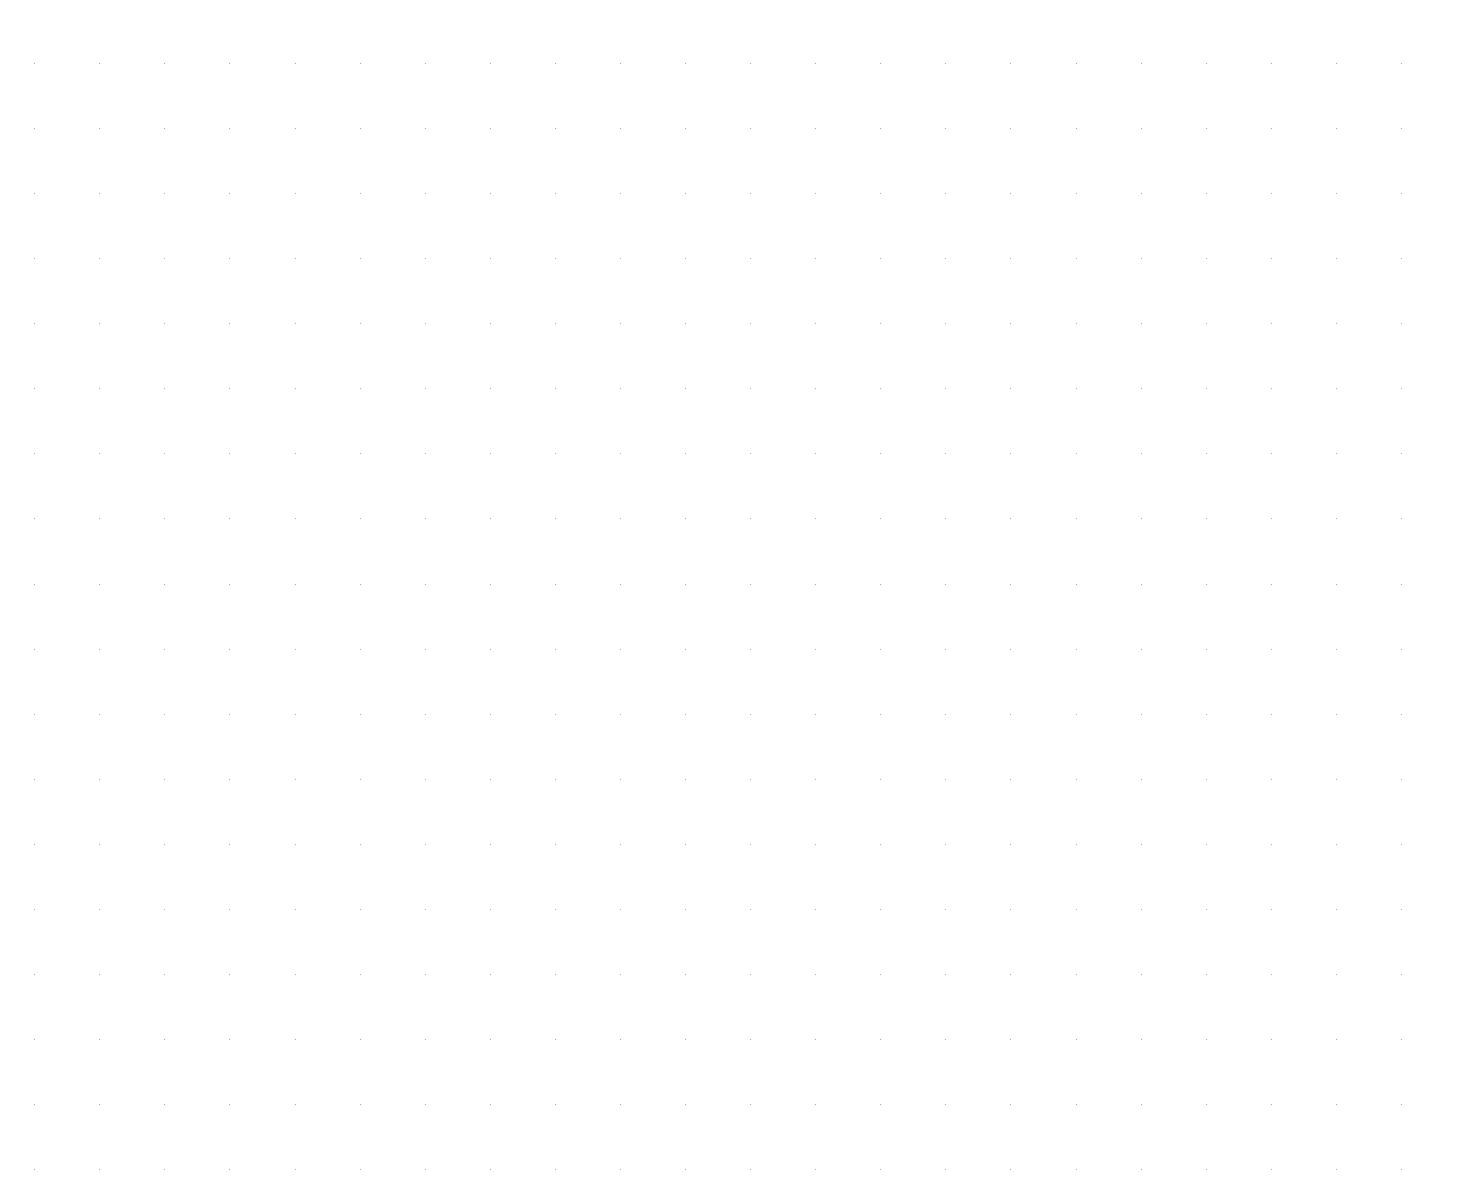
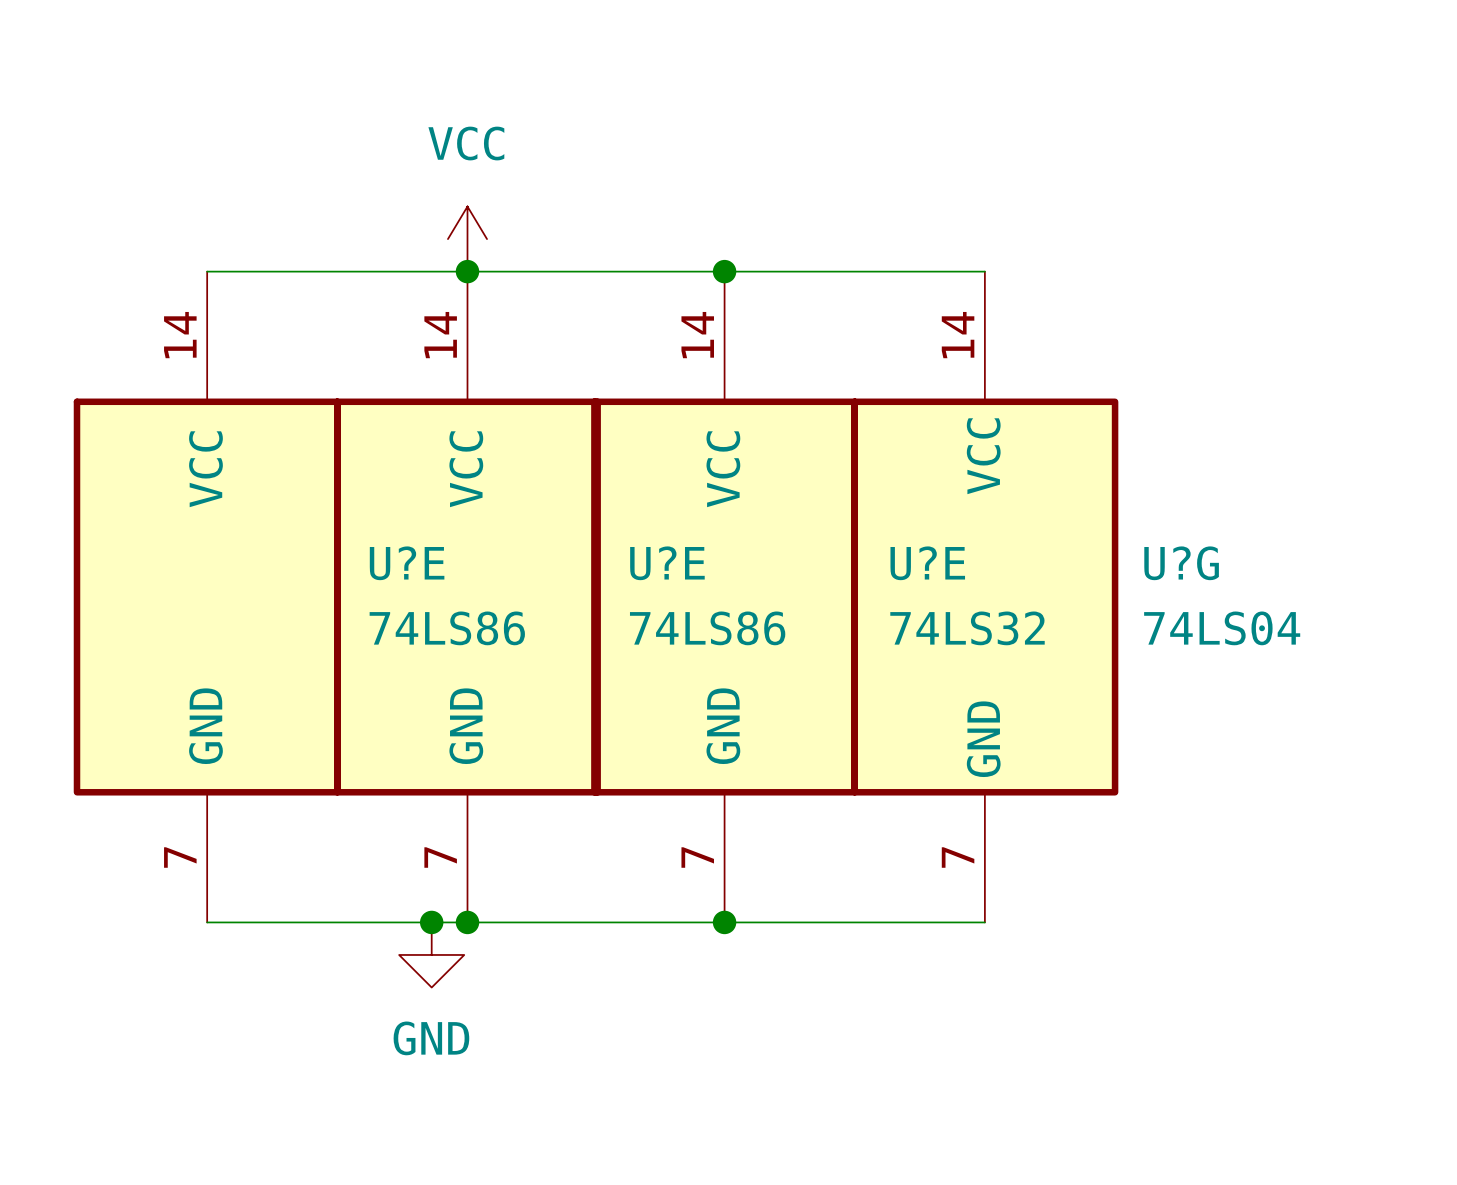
power symbol: none -> VCC (467, 239)
wire: none -> (207, 271) (984, 271)
junction: none -> (467, 271)
junction: none -> (724, 271)
U?E: none -> 74LS86 (207, 597)
U?E: none -> 74LS86 (467, 597)
U?E: none -> 74LS32 (724, 597)
U?G: none -> 74LS04 (984, 597)
wire: none -> (207, 922) (984, 922)
junction: none -> (431, 922)
junction: none -> (467, 922)
junction: none -> (724, 922)
power symbol: none -> GND (431, 954)

